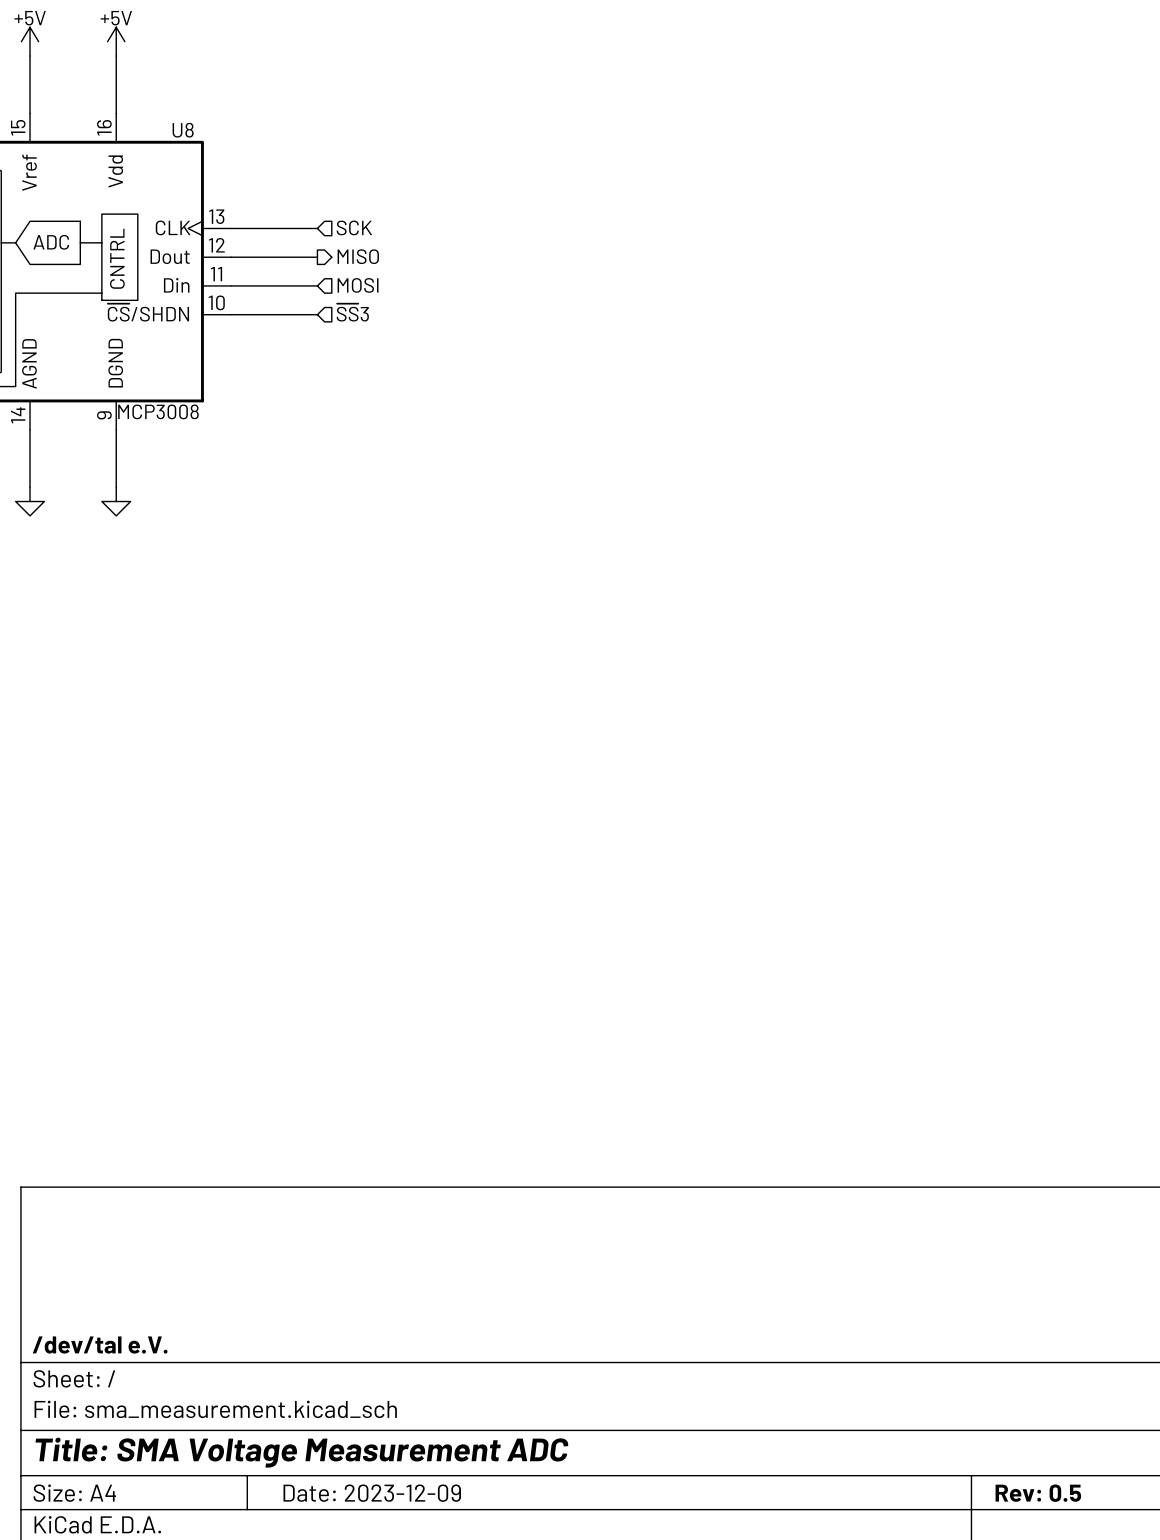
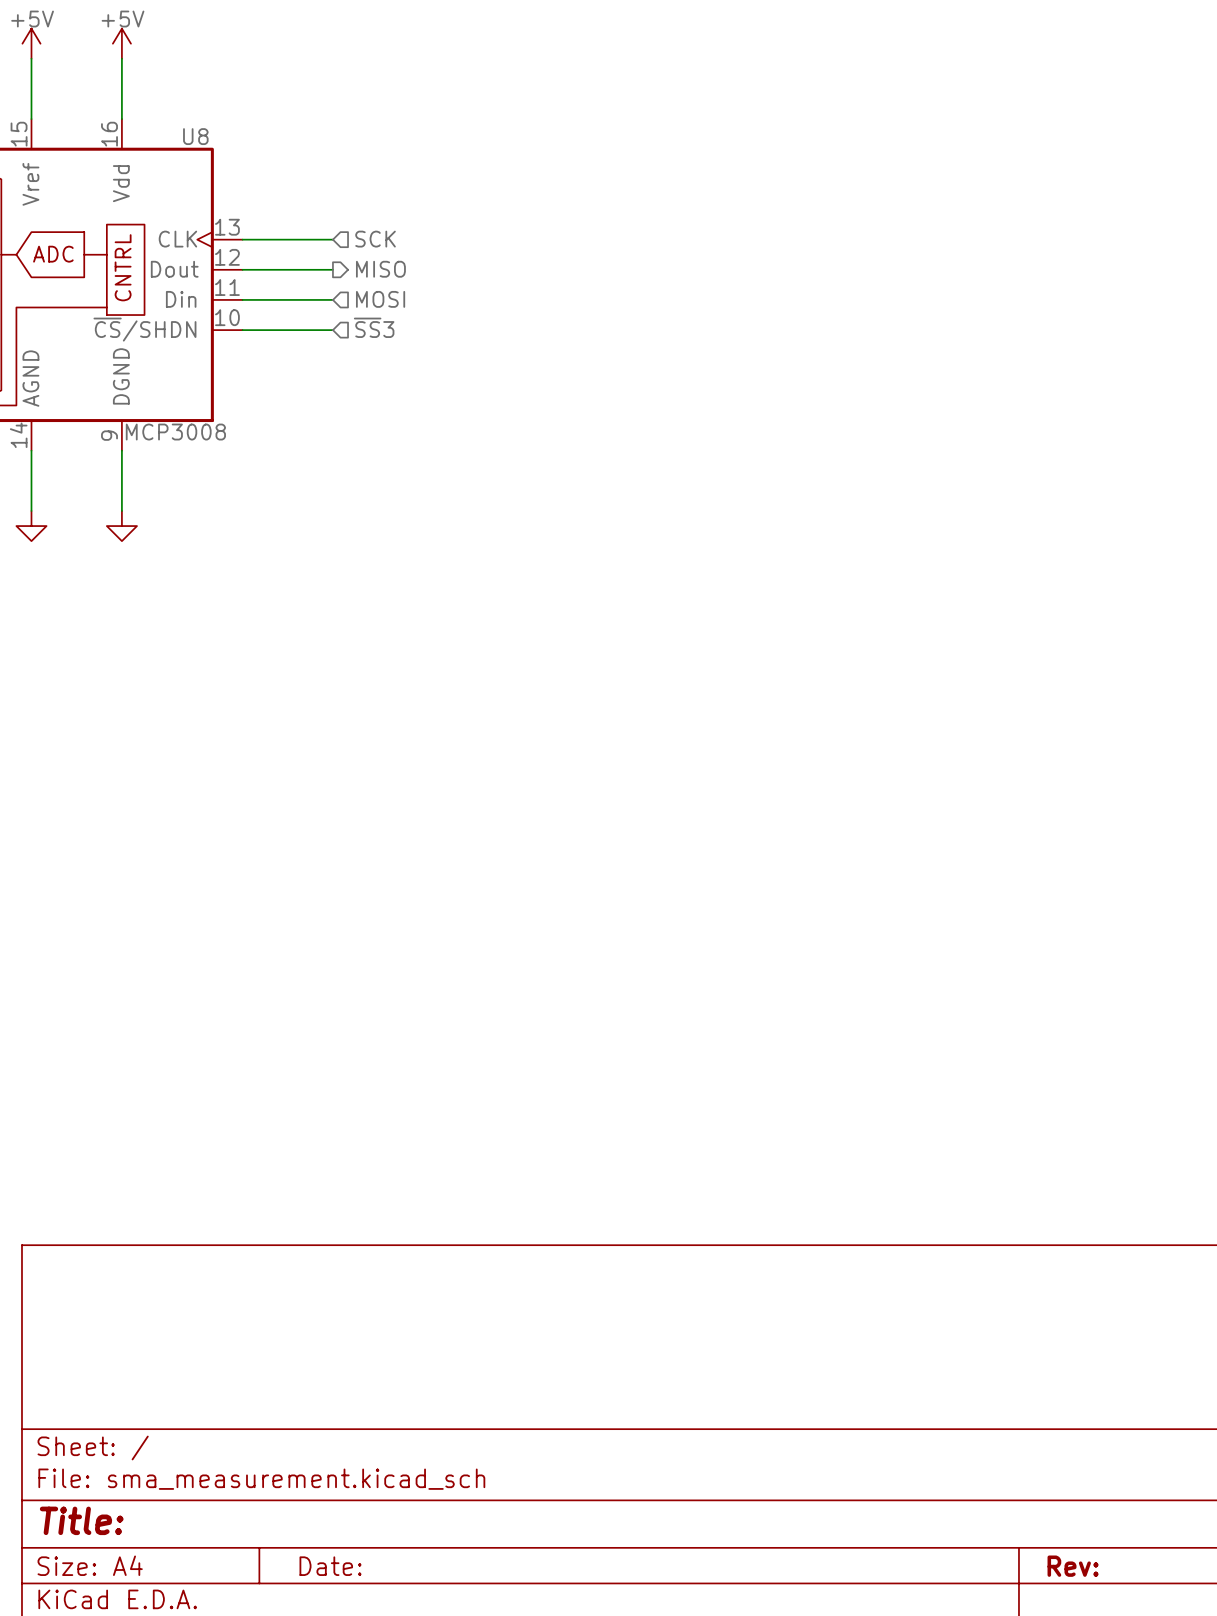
title block: /dev/tal e.V. (100, 1345) -> none
title block: Title: SMA Voltage Measurement ADC (302, 1452) -> Title: (81, 1520)
title block: Date: 2023-12-09 (372, 1493) -> Date: (330, 1566)
title block: Rev: 0.5 (1038, 1493) -> Rev: (1073, 1566)

